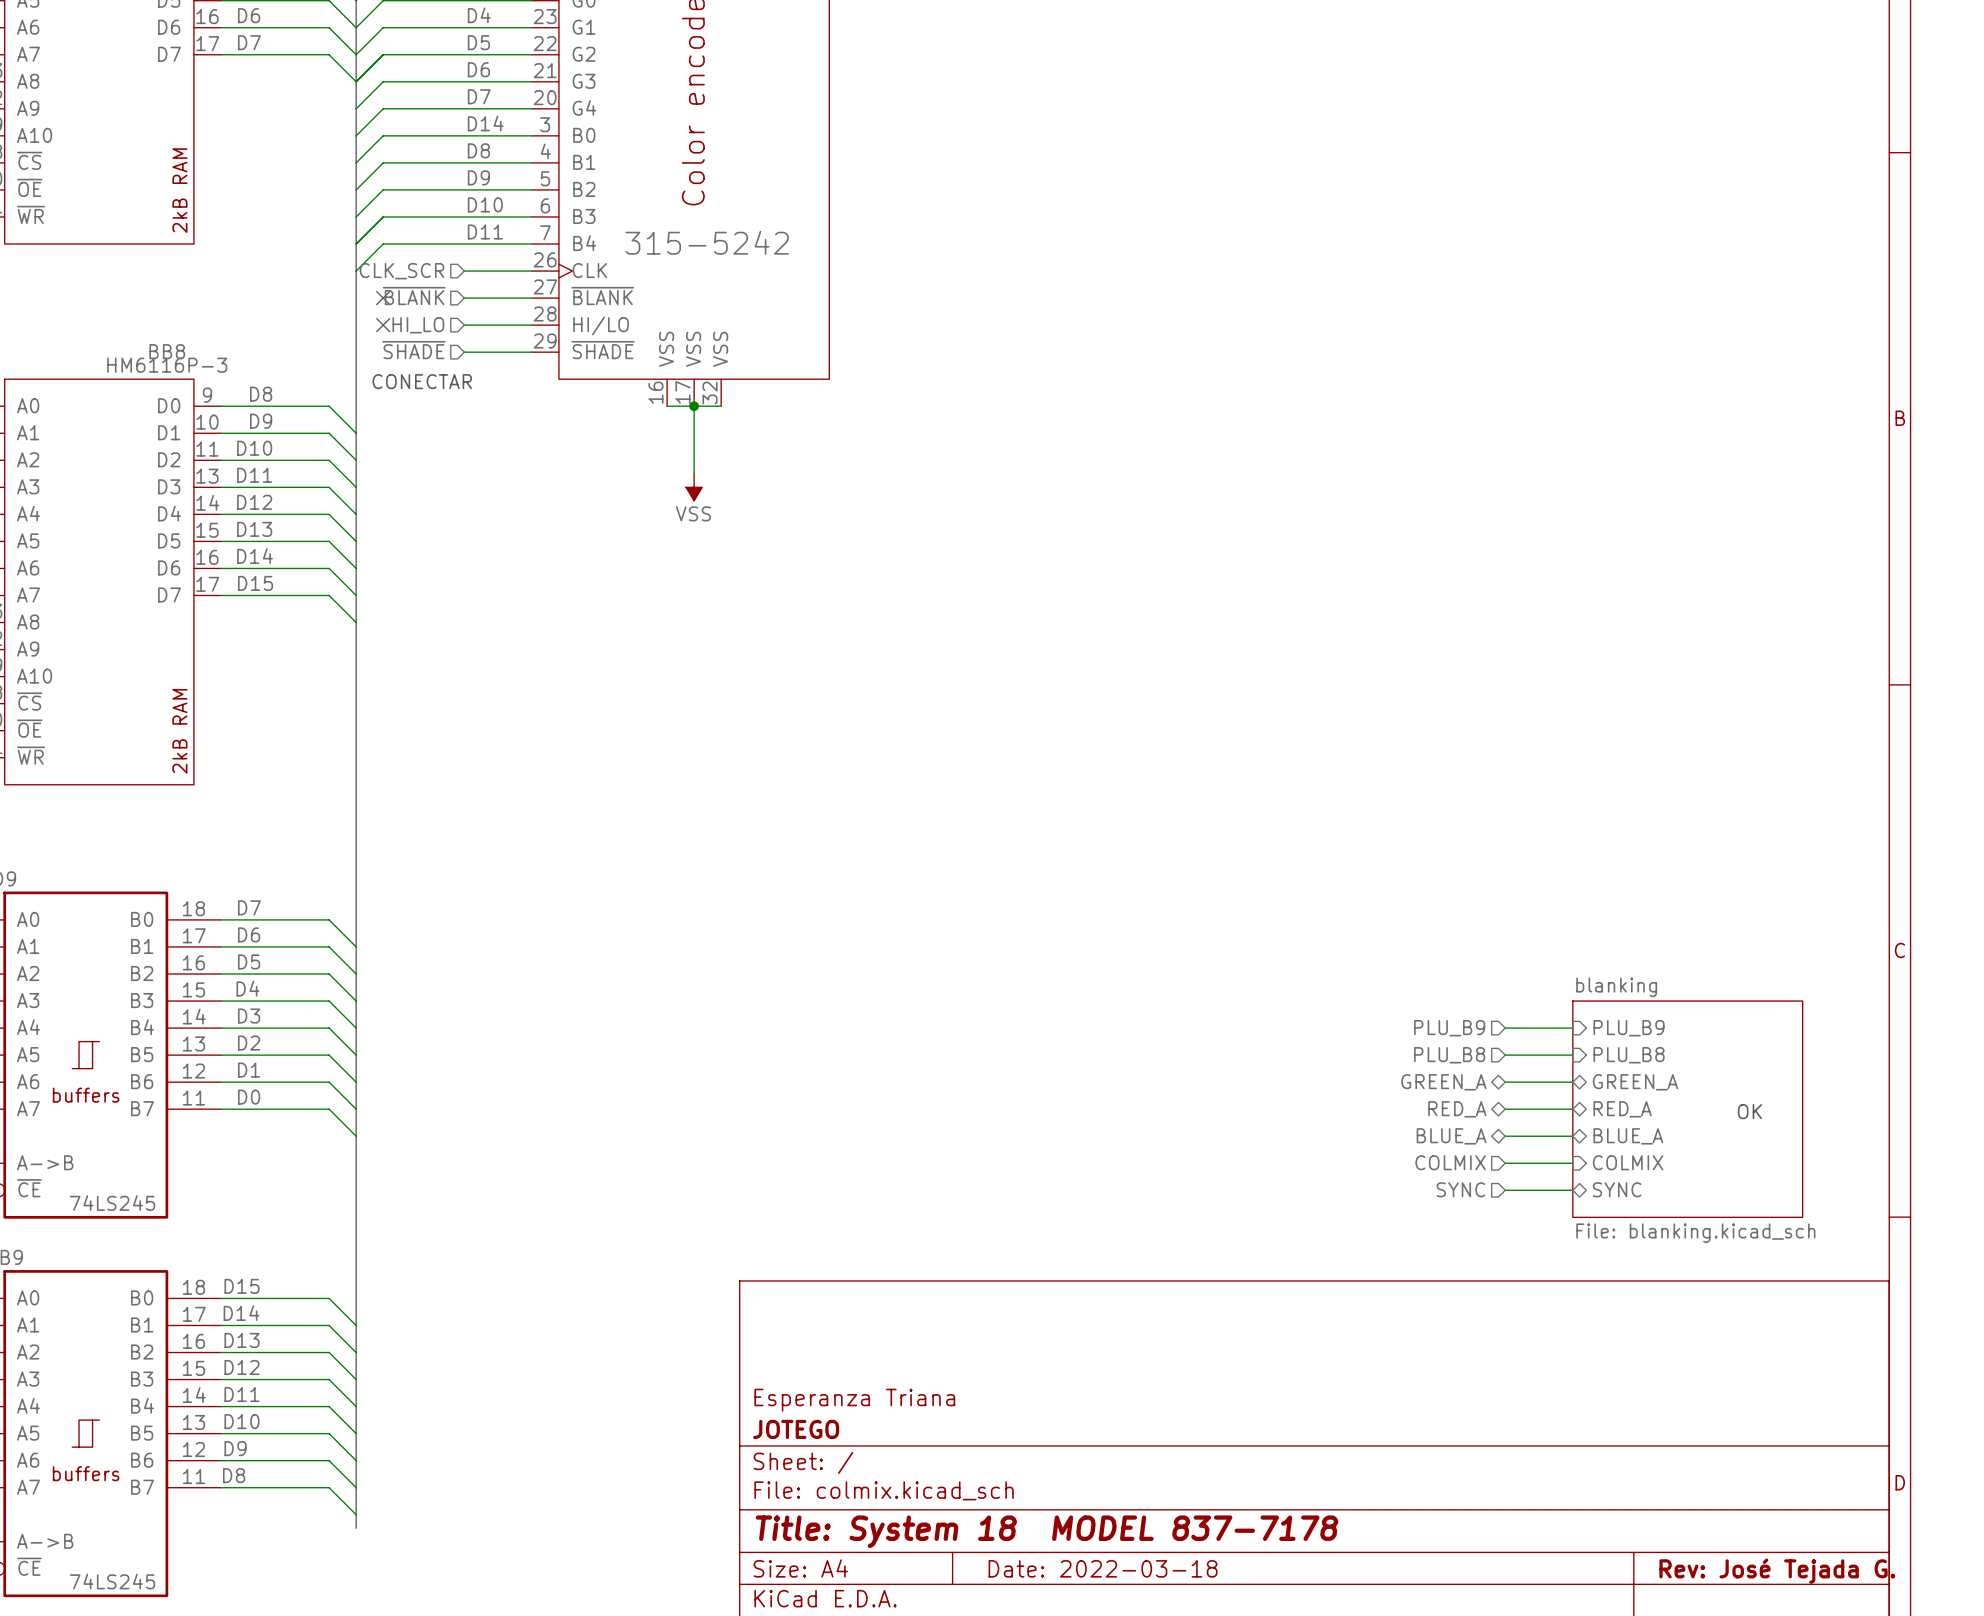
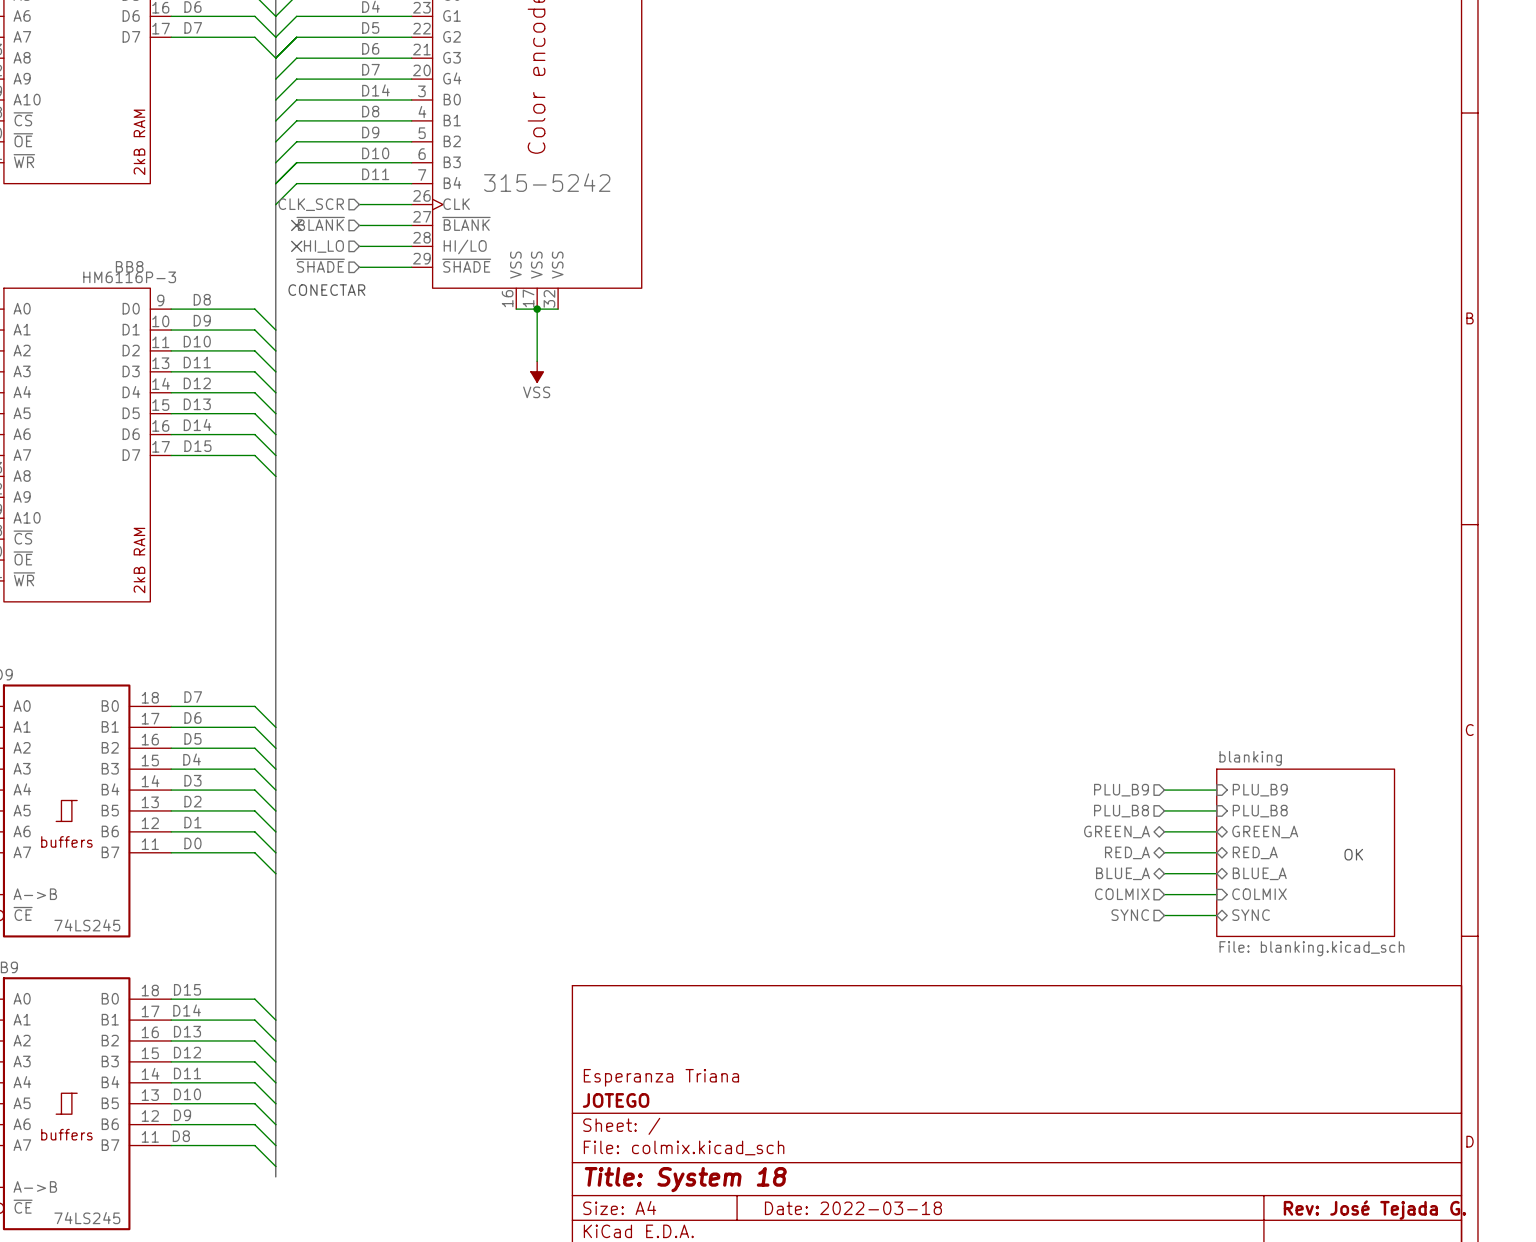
title block: Title: System 18 MODEL 837-7178 (1046, 1531) -> Title: System 18 (685, 1179)

